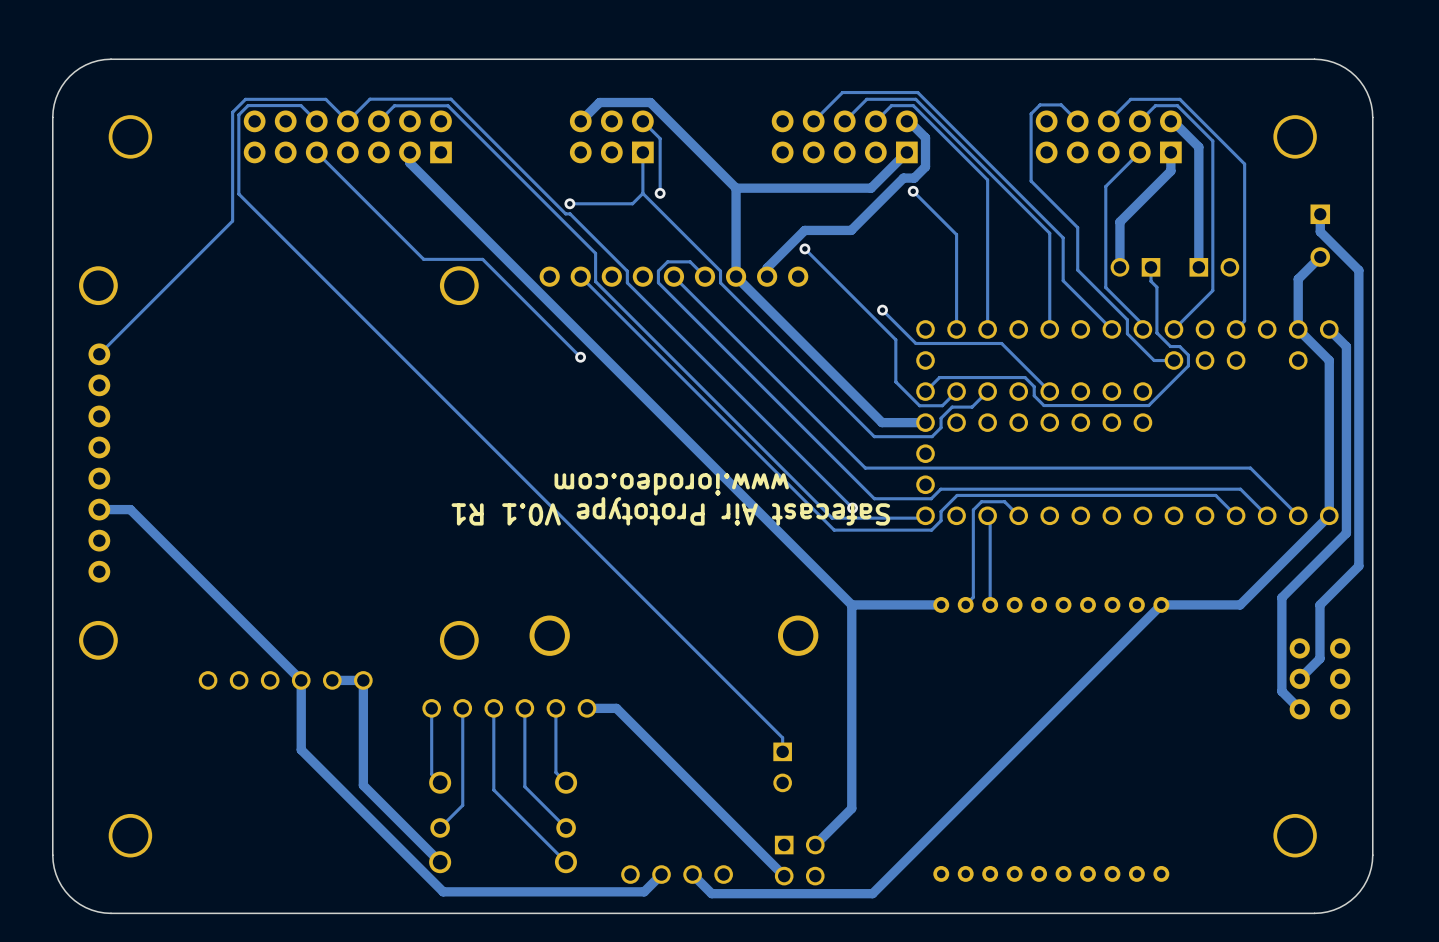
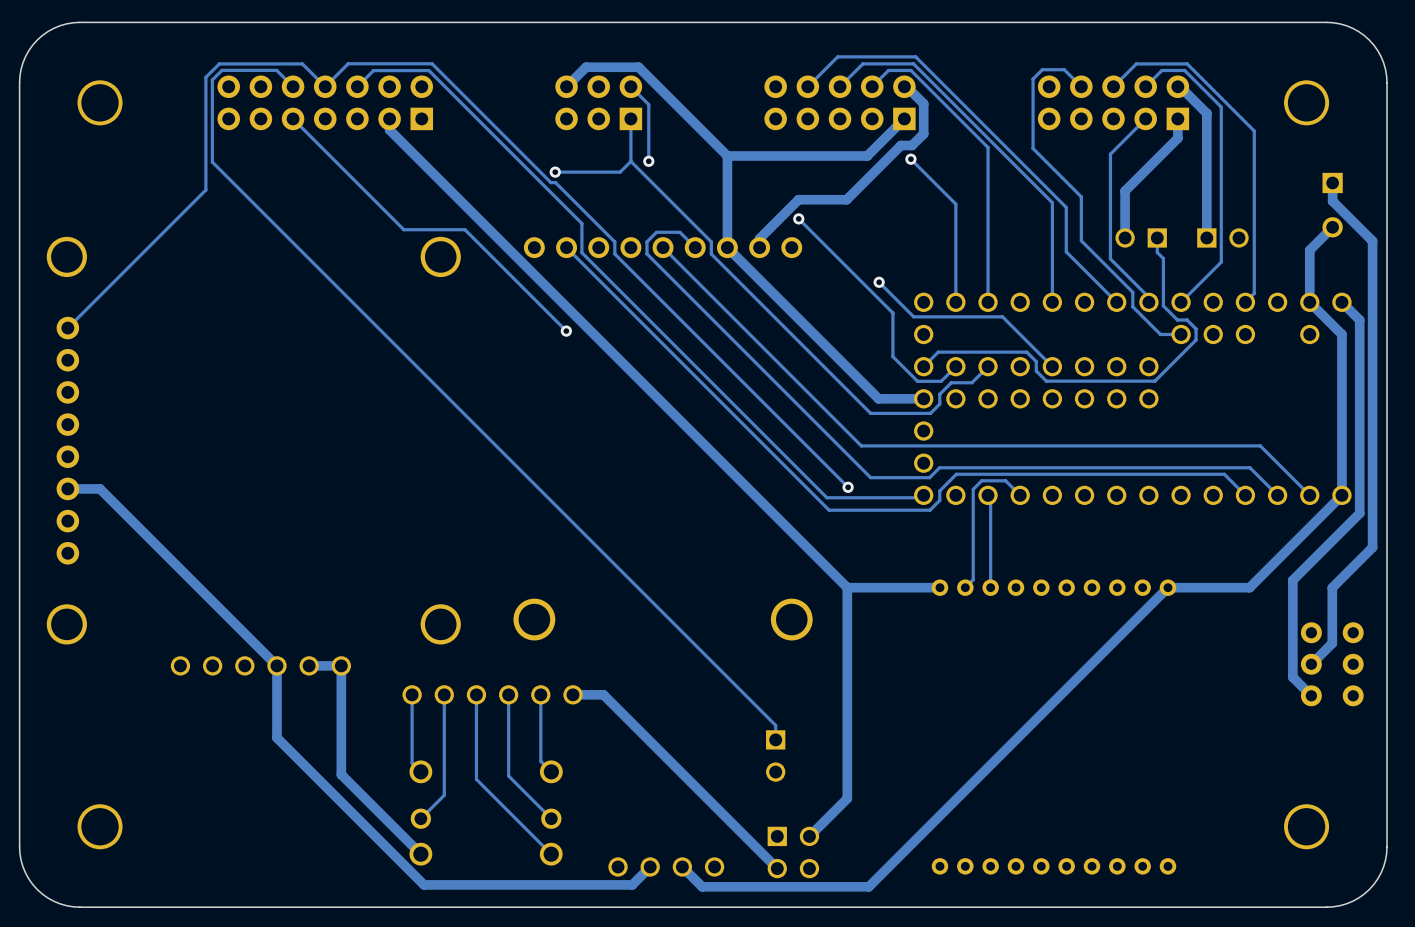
text: www.iorodeo.com (671, 484) -> none
text: Safecast Air Prototype V0.1 R1 (670, 511) -> none

